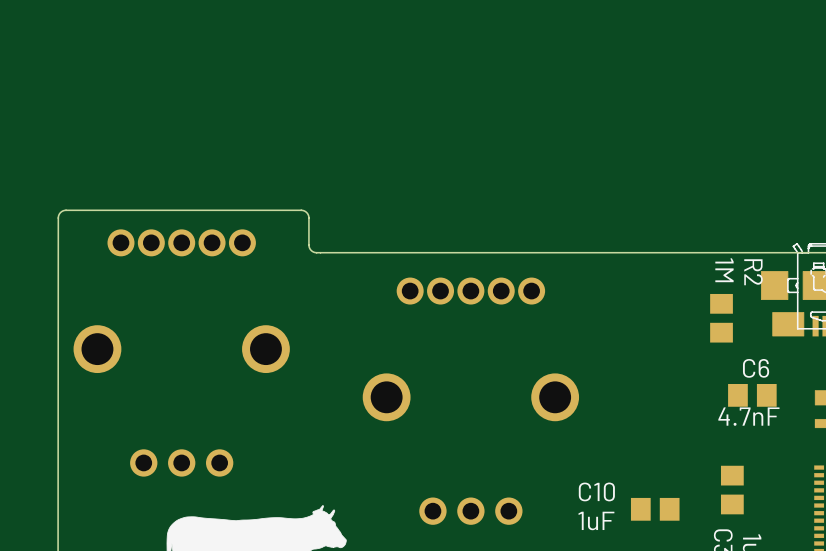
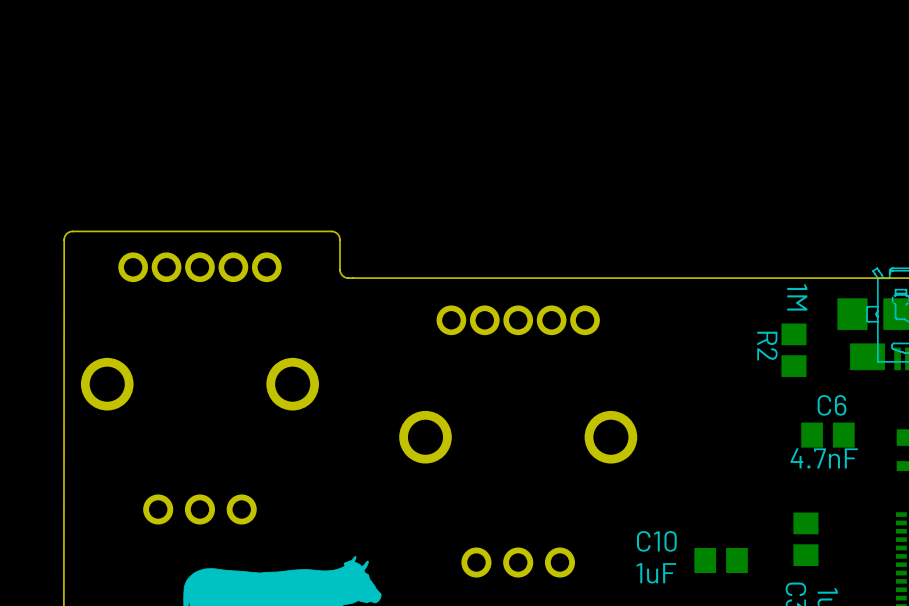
R2 name position: R2 (753, 272) -> R2 (767, 346)

